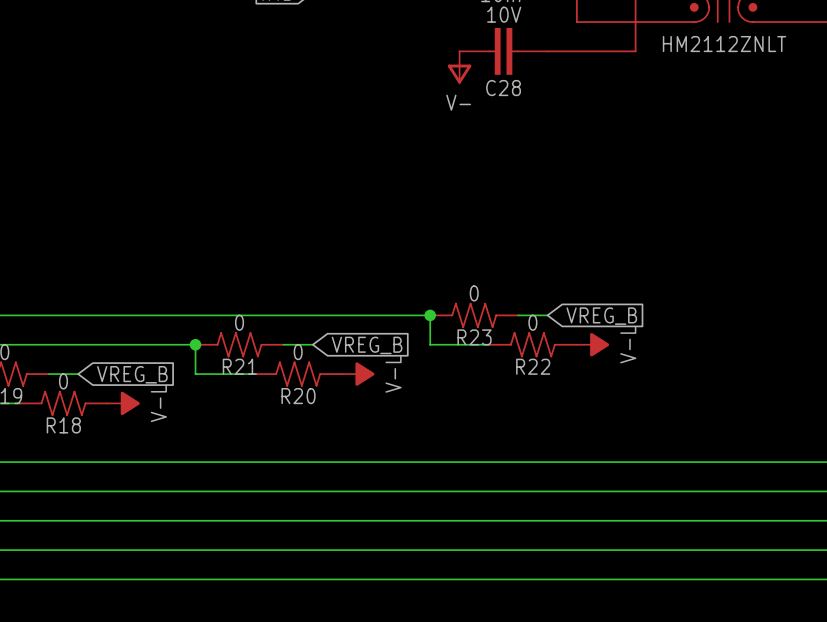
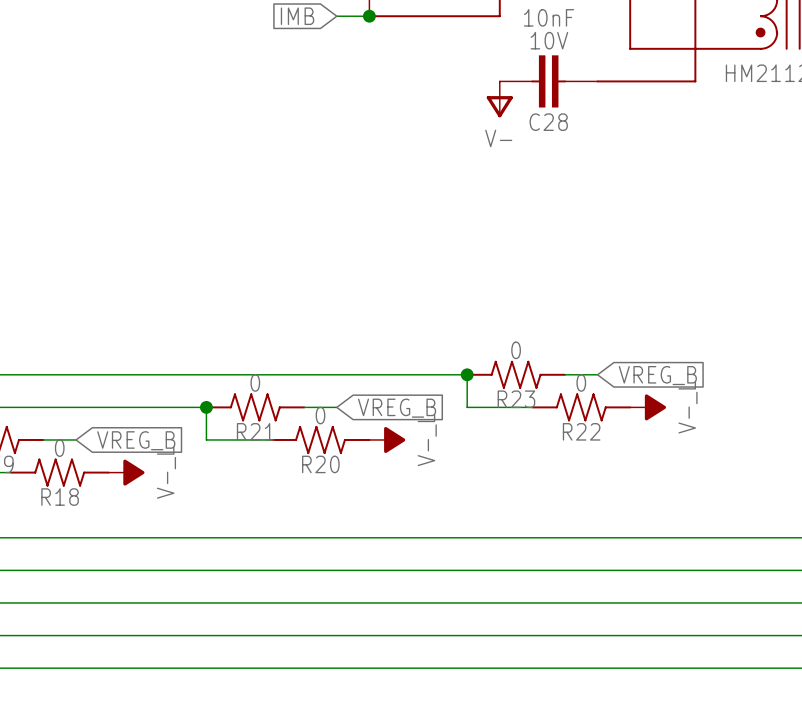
power symbol: V-L (593, 344) -> V-_L (648, 407)
power symbol: V-L (358, 374) -> V-_L (387, 439)
power symbol: V-L (123, 403) -> V-_L (126, 472)

